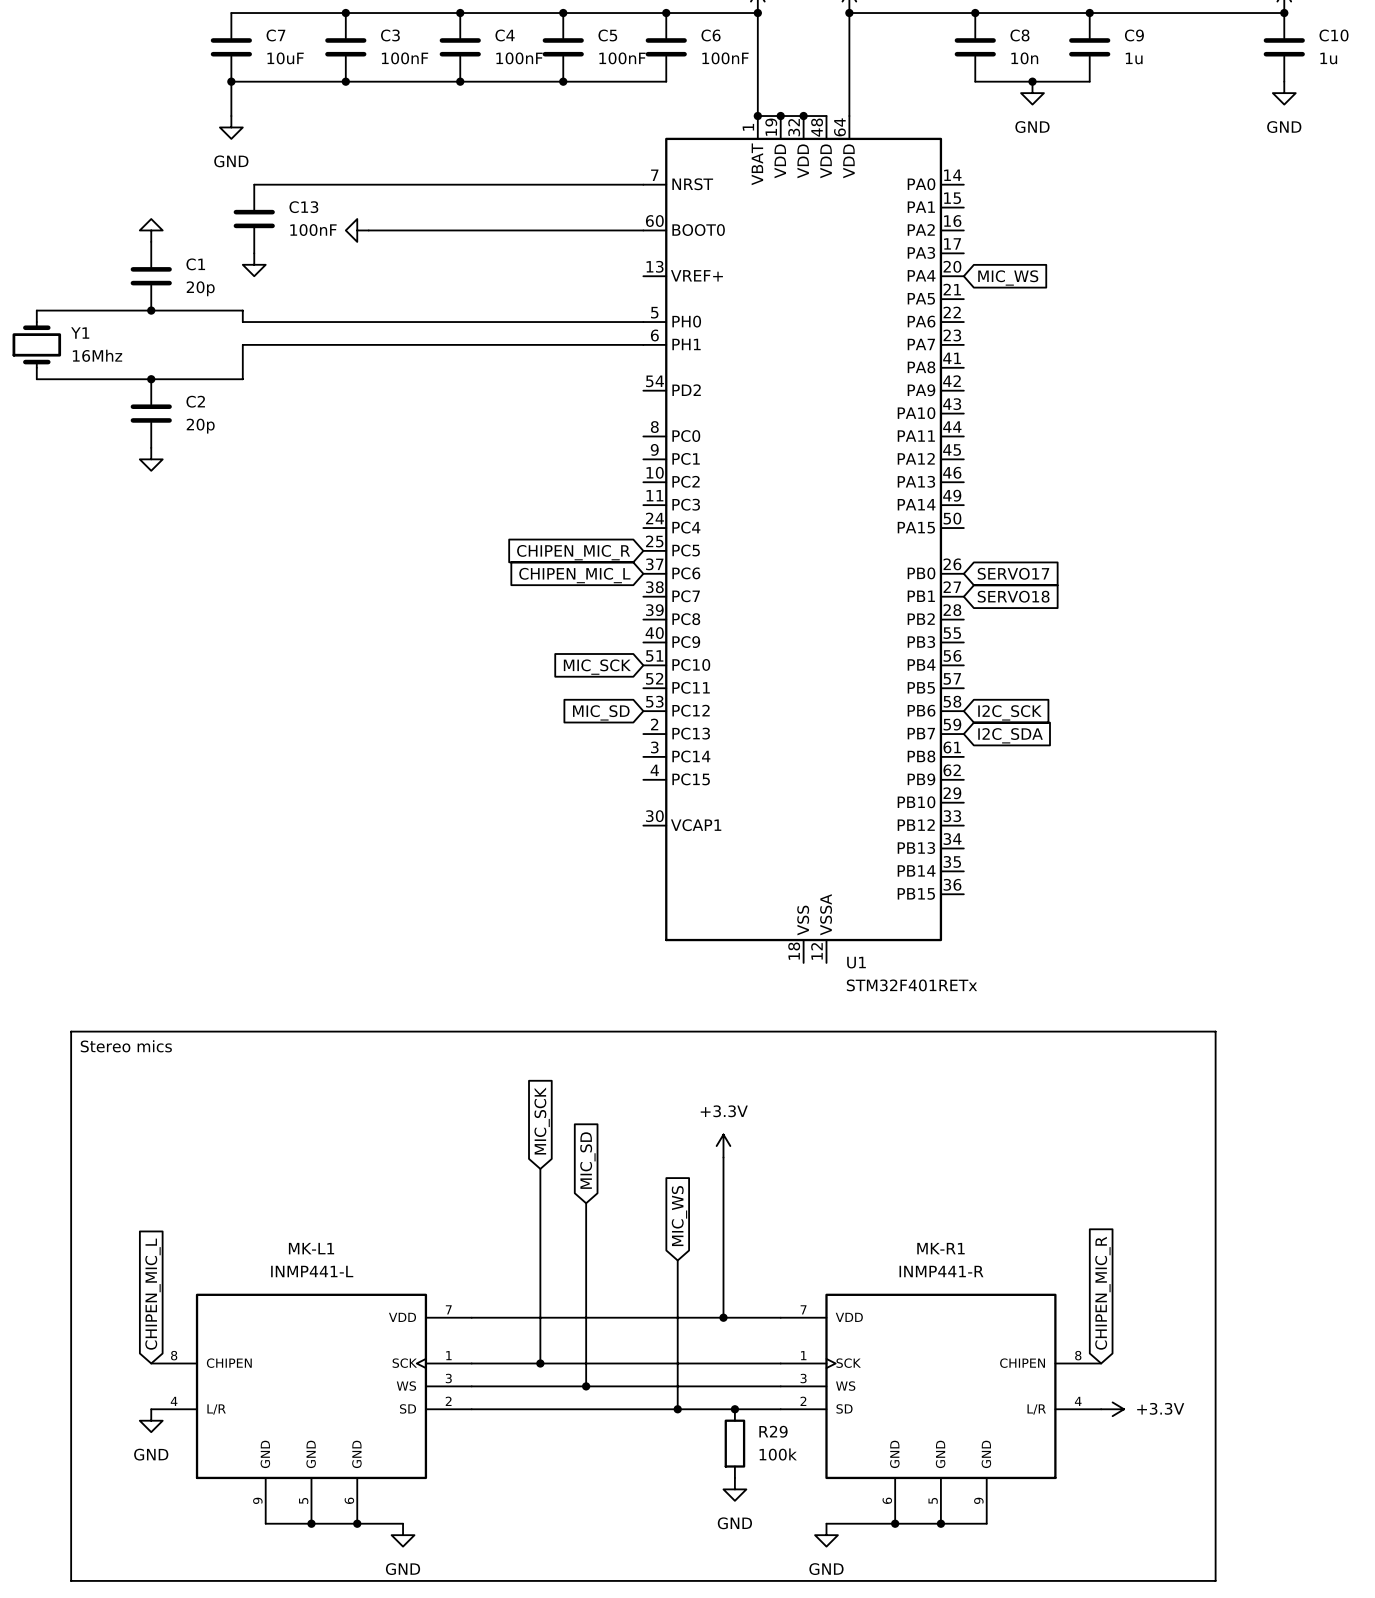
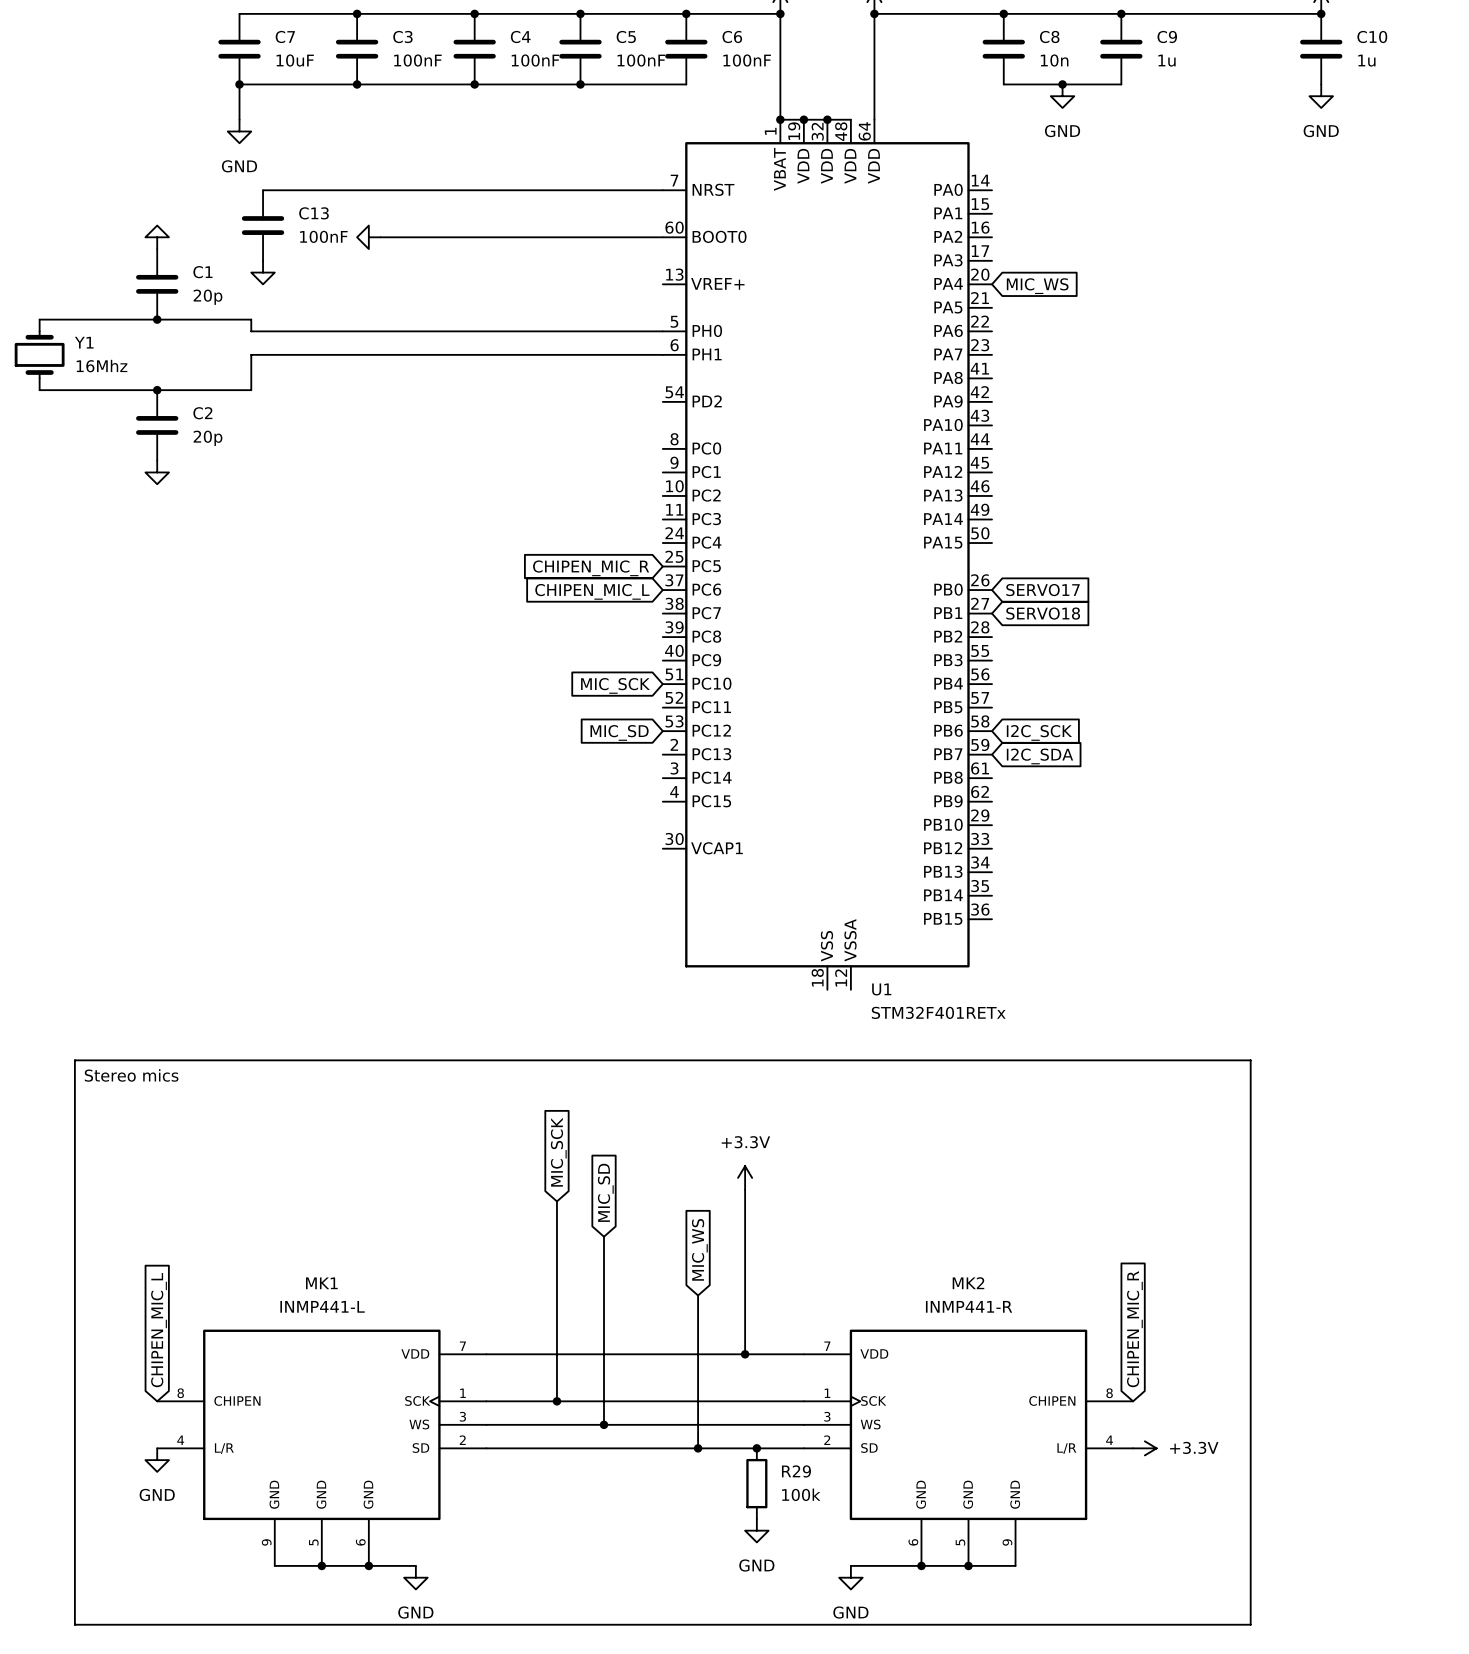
MK-L1 name: MK-L1 (311, 1248) -> MK1 (321, 1283)
MK-R1 name: MK-R1 (940, 1248) -> MK2 (968, 1283)

